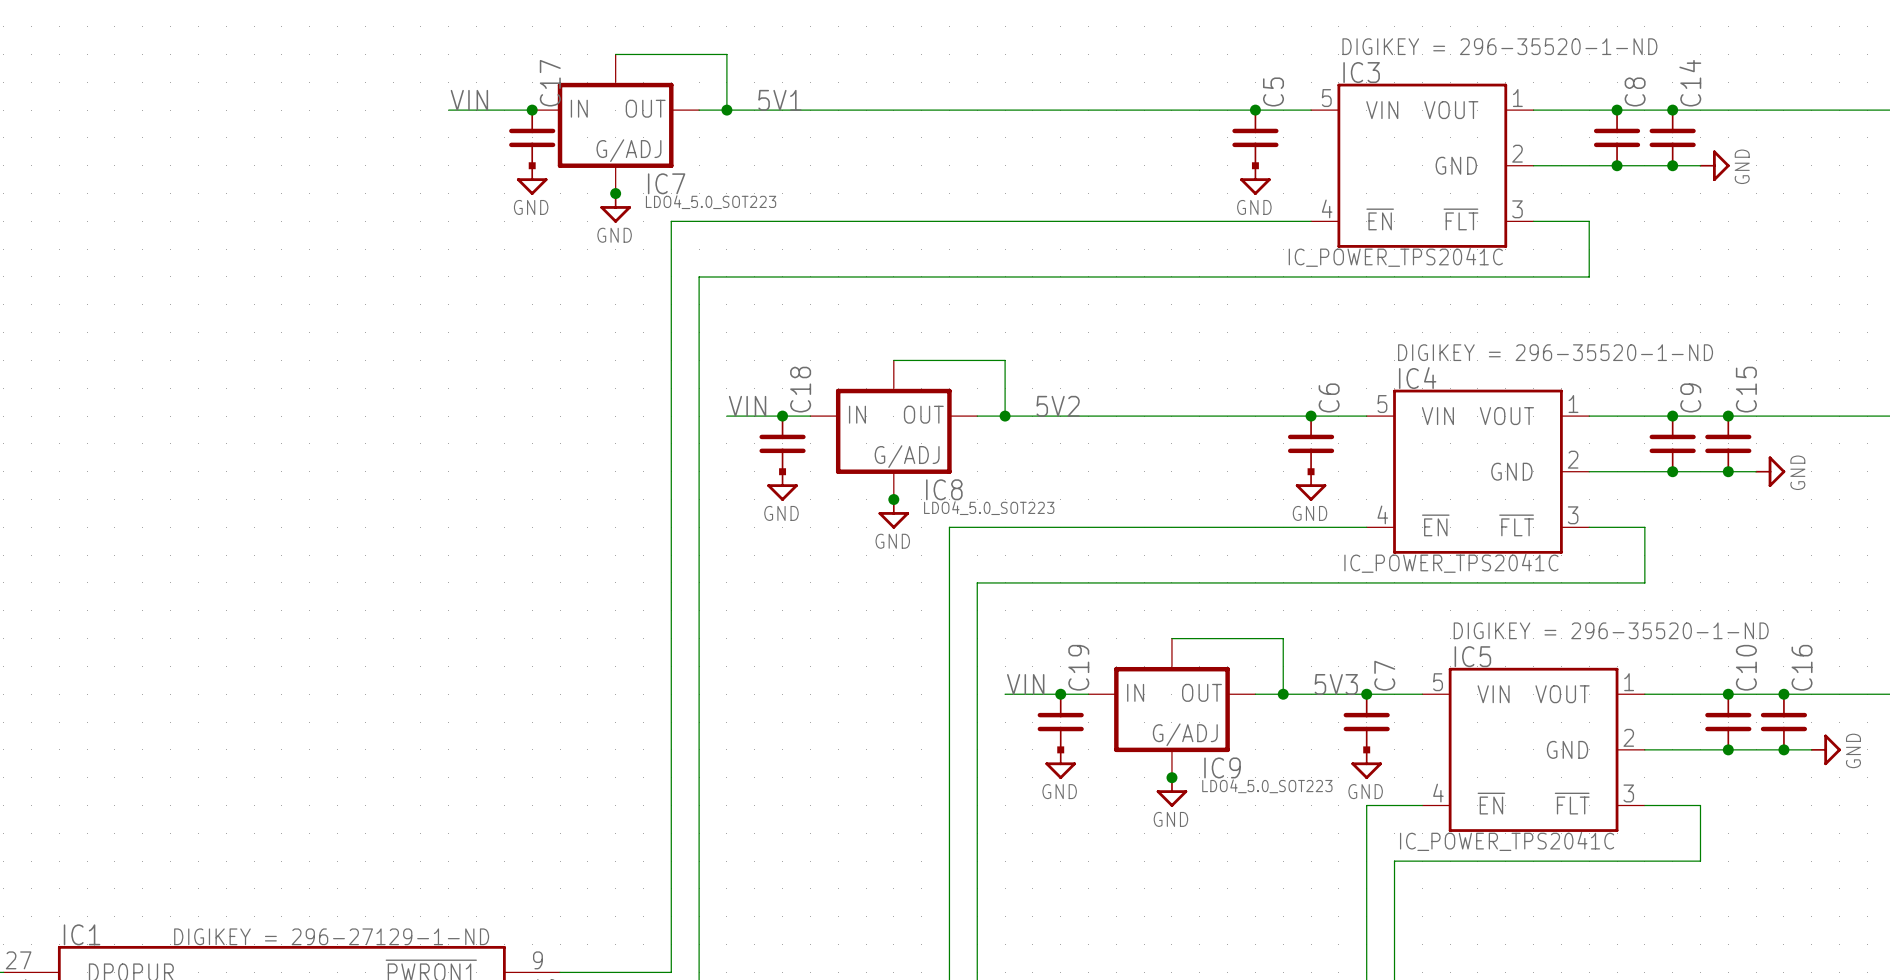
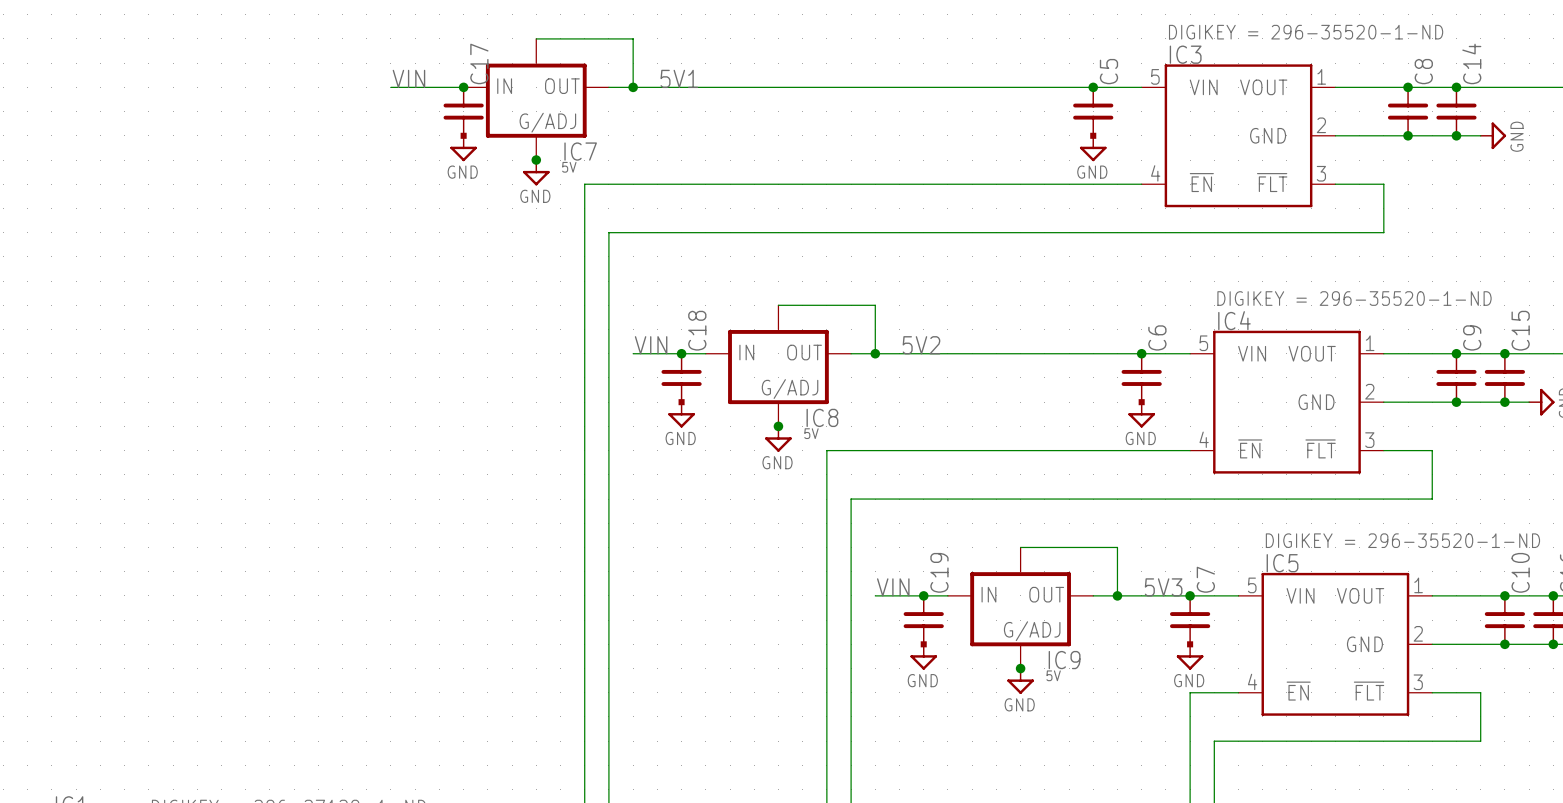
IC7 value: LDO4_5.0_SOT223 (711, 202) -> 5V (569, 167)
IC3 value: IC_POWER_TPS2041C (1395, 257) -> none
IC8 value: LDO4_5.0_SOT223 (989, 508) -> 5V (811, 433)
IC4 value: IC_POWER_TPS2041C (1451, 563) -> none
IC9 value: LDO4_5.0_SOT223 (1267, 786) -> 5V (1053, 675)
IC5 value: IC_POWER_TPS2041C (1507, 841) -> none

